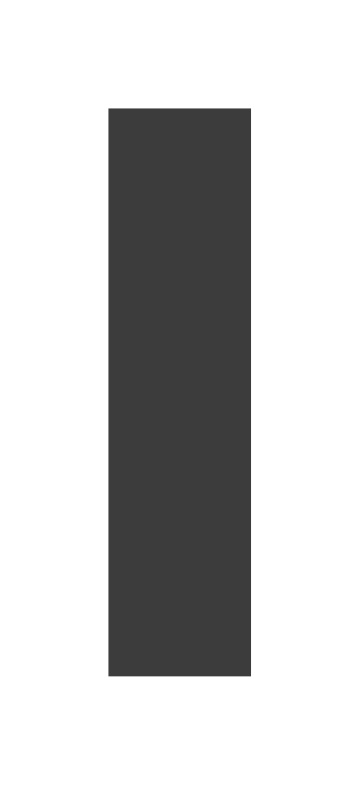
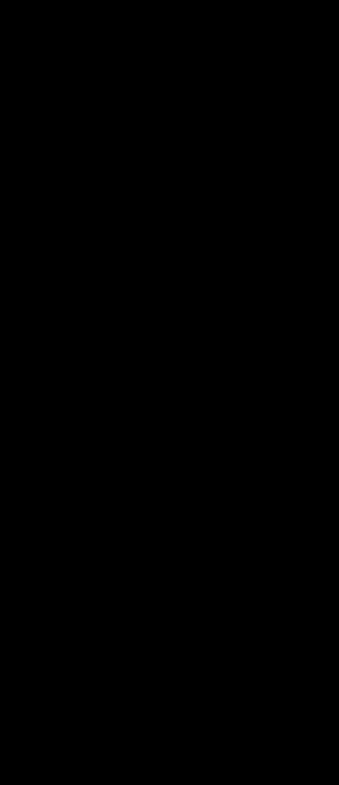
drawing: [108, 108, 252, 677] -> none

